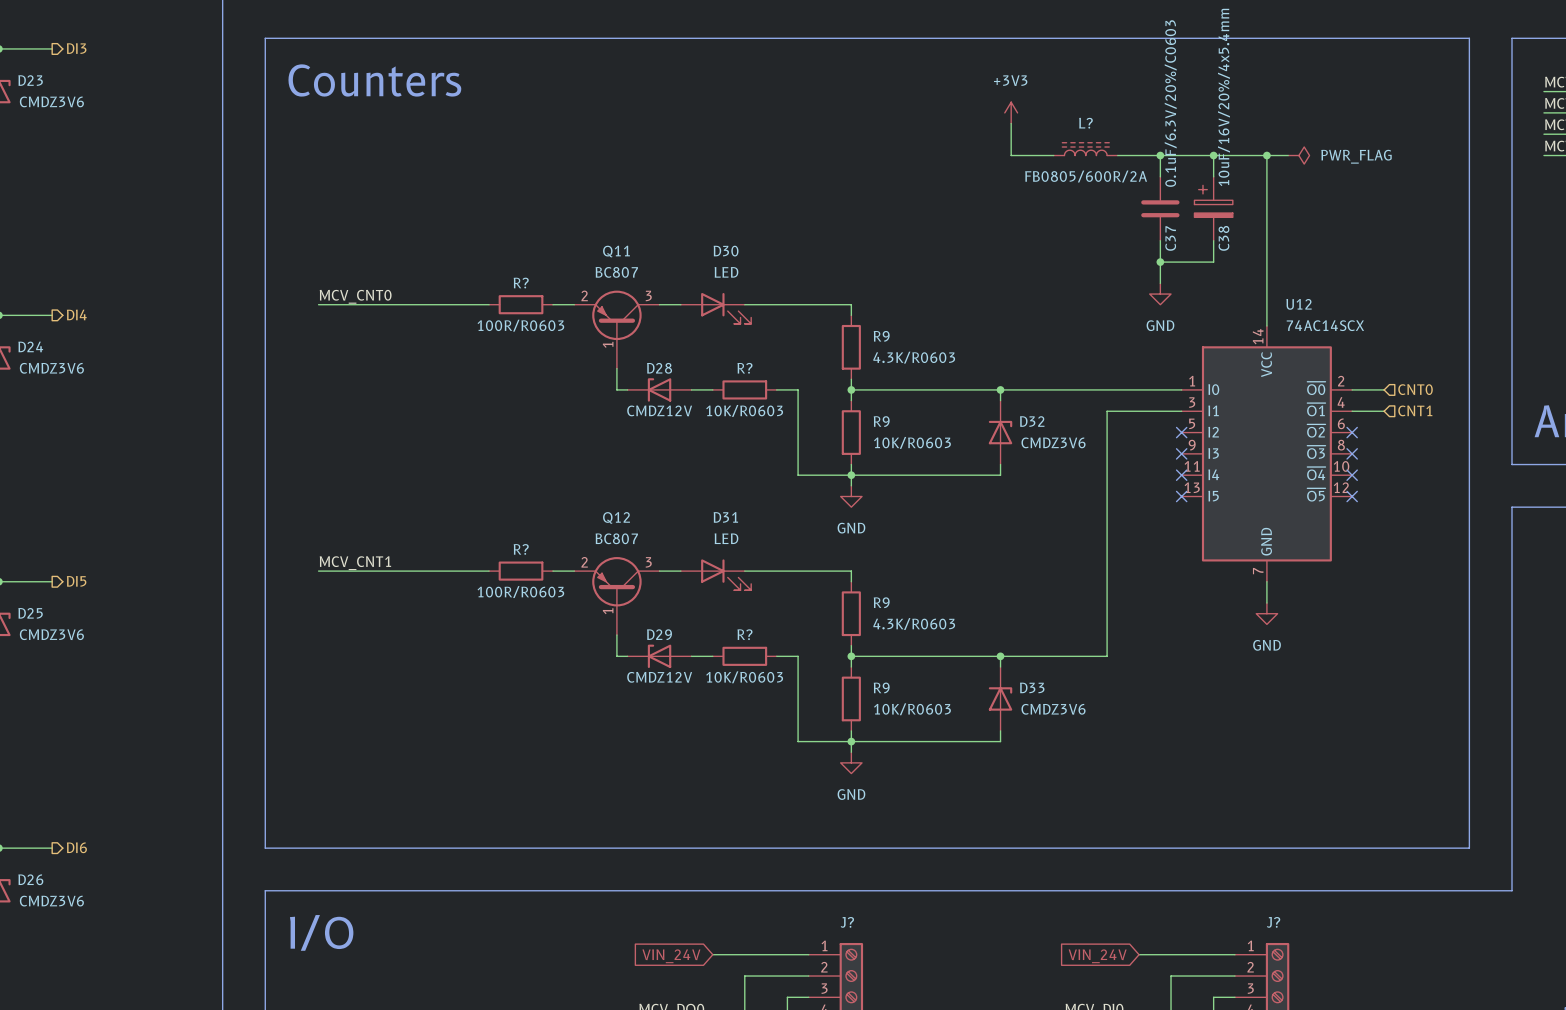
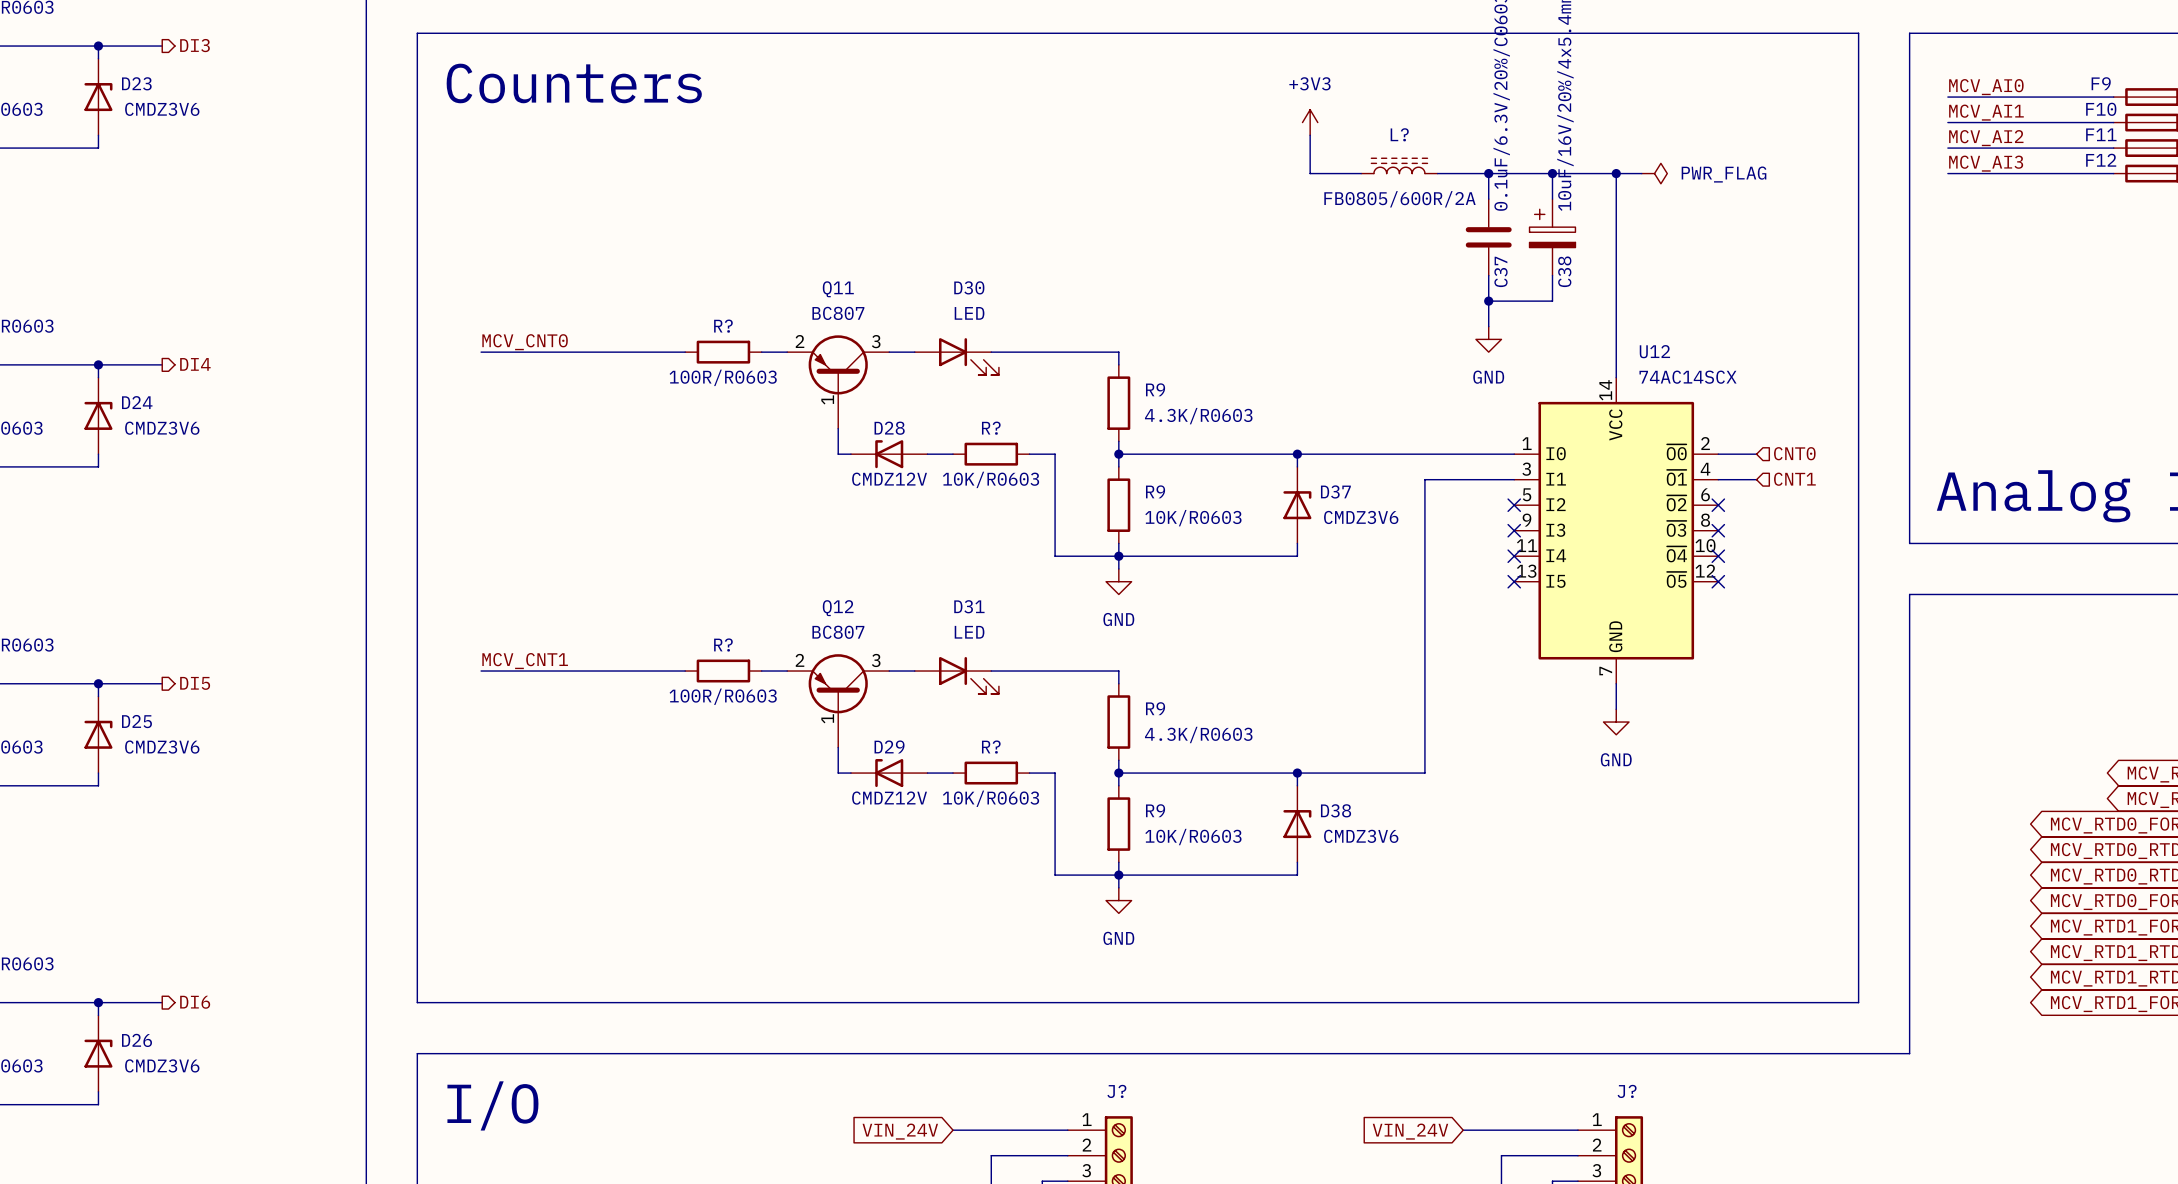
D32 name: D32 (1032, 421) -> D37 (1335, 491)
D33 name: D33 (1032, 687) -> D38 (1336, 810)

